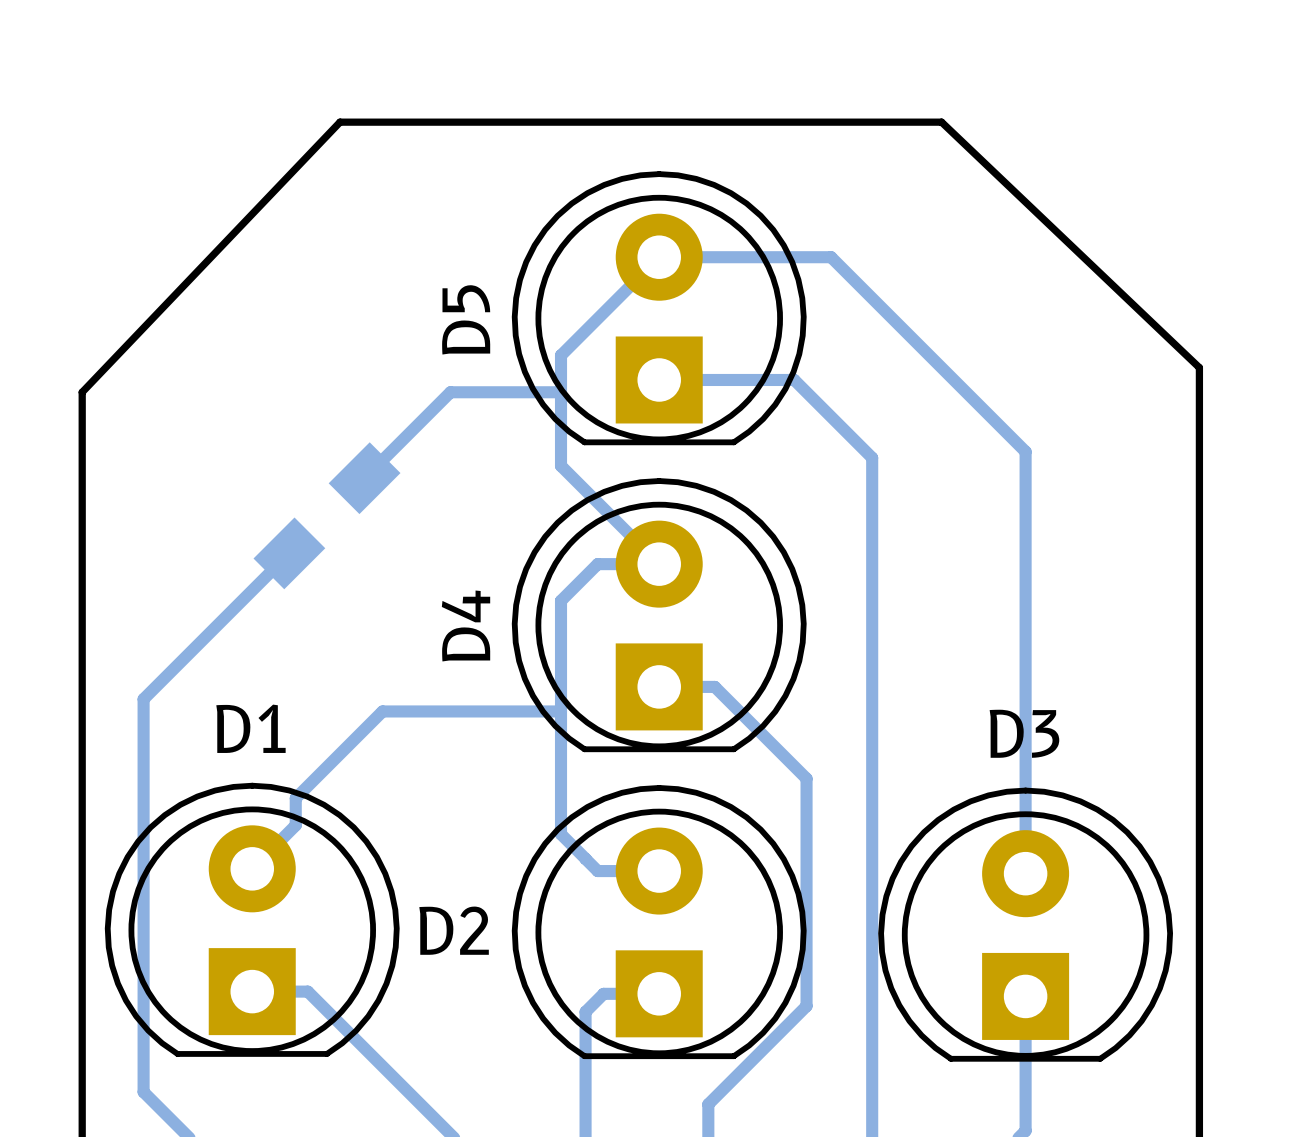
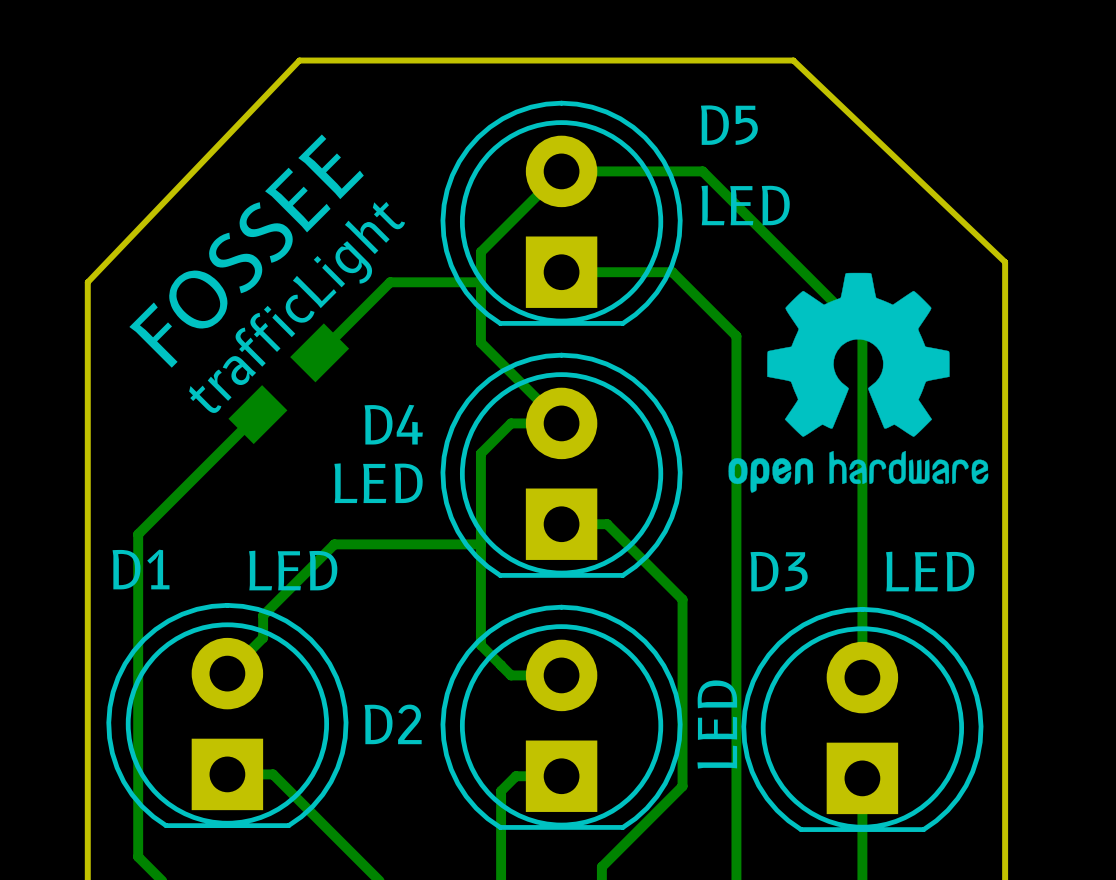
D5 value: none -> LED (745, 205)
D5 name rotation: 0° (466, 319) -> 90° clockwise (729, 125)
D5 name position: D5 (466, 319) -> D5 (729, 125)
text: none -> FOSSEE (246, 251)
drawing: none -> [728, 272, 989, 493]
text: none -> trafficLight (297, 307)
D4 name rotation: 0° (466, 625) -> 90° clockwise (393, 424)
D4 value: none -> LED (378, 483)
D1 name position: D1 (250, 728) -> D1 (141, 569)
D3 name position: D3 (1024, 733) -> D3 (779, 571)
D1 value: none -> LED (293, 570)
D3 value: none -> LED (930, 571)
D2 value: none -> LED (717, 724)

